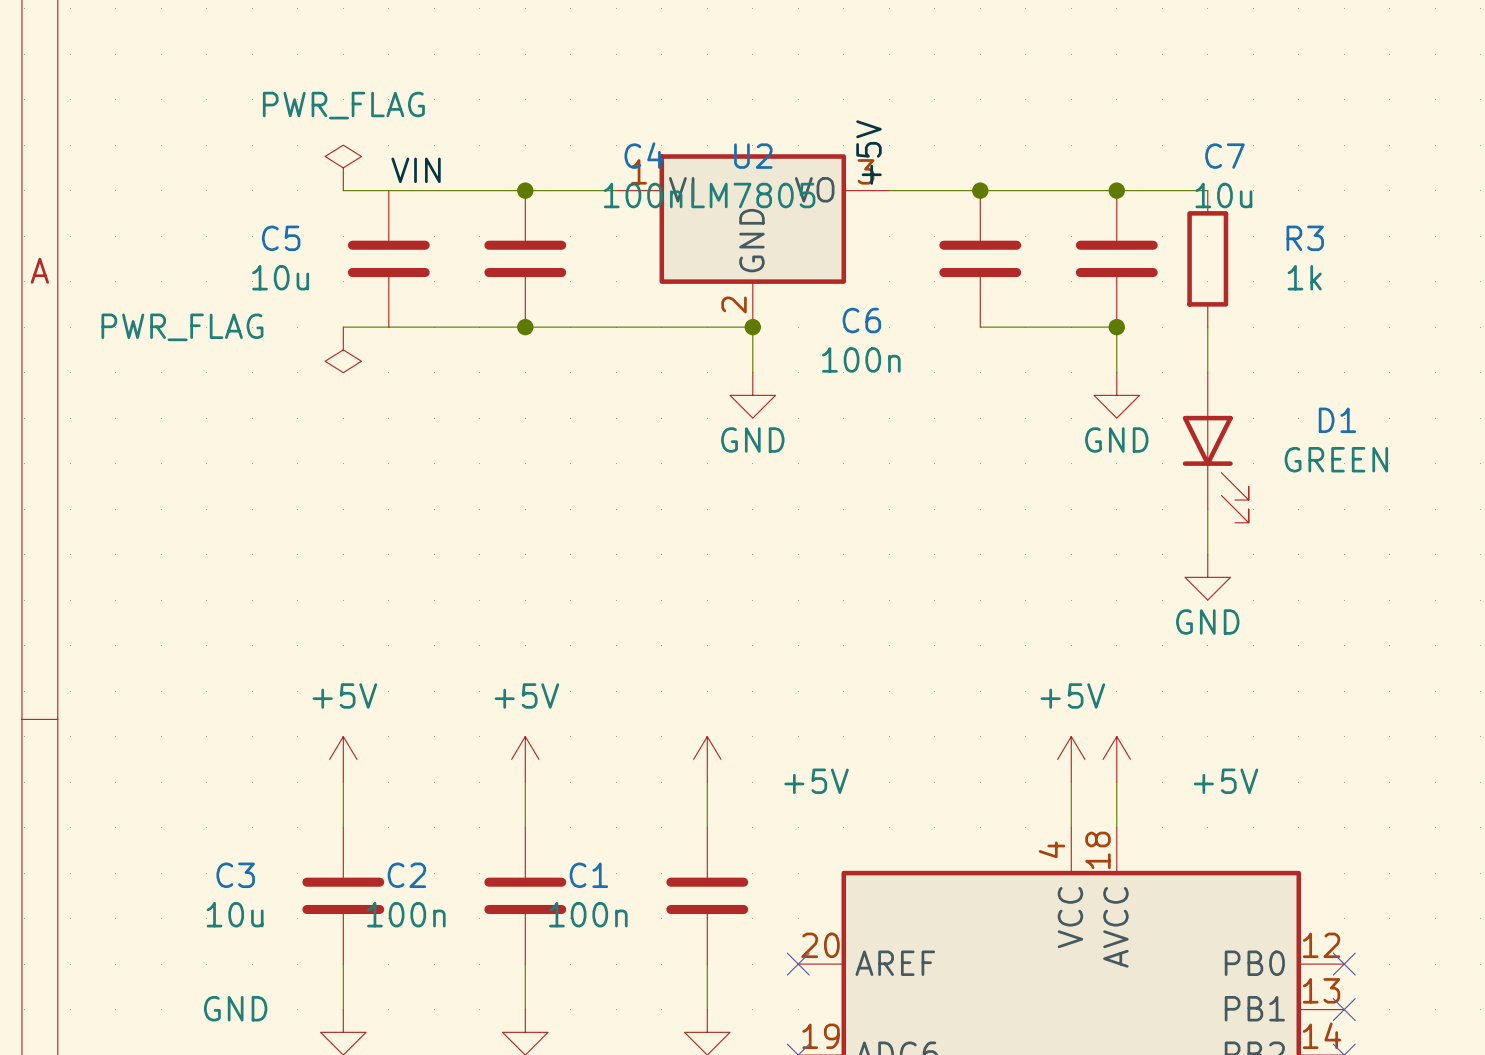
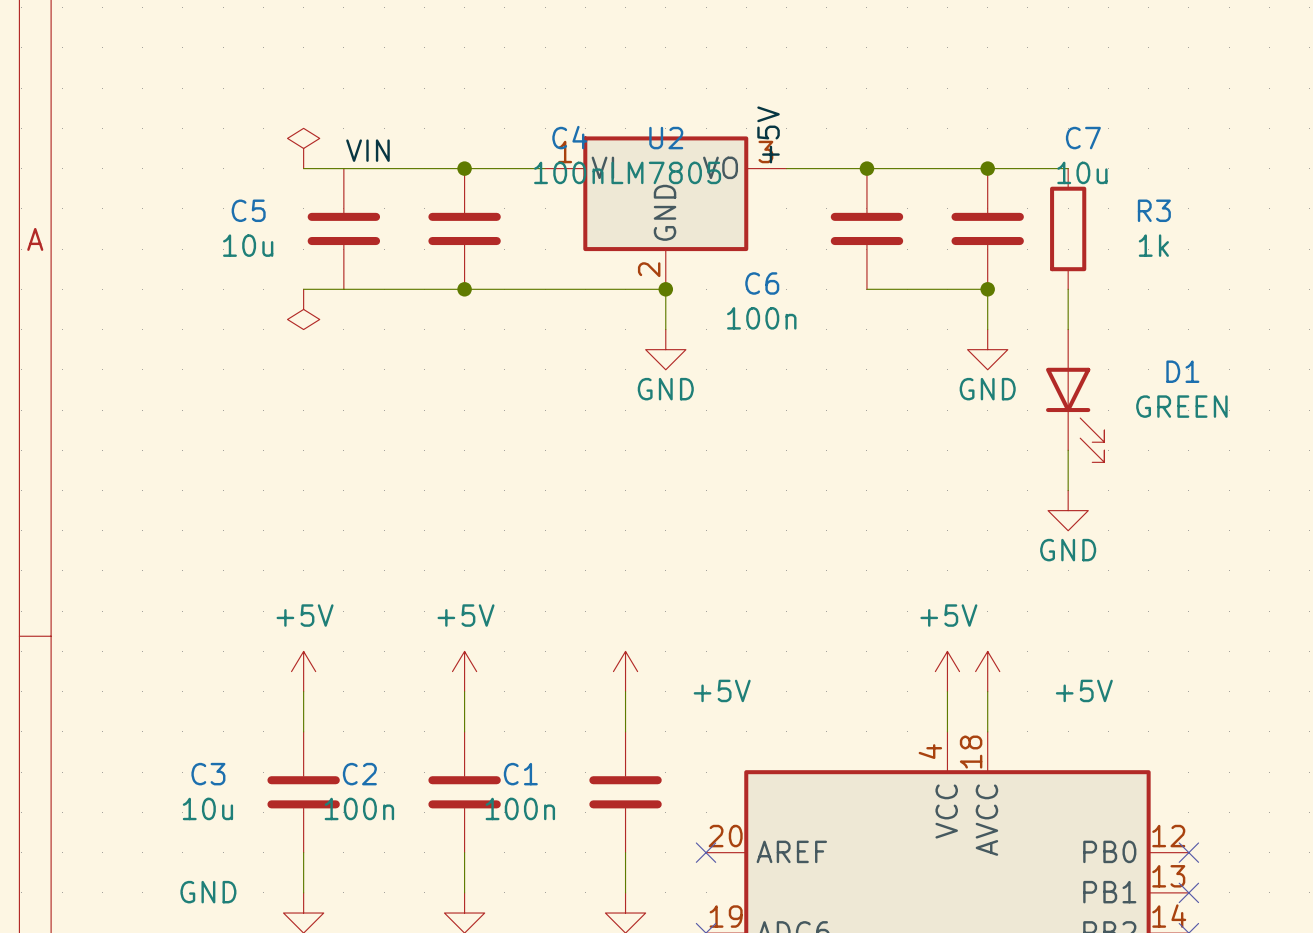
power symbol text: PWR_FLAG (343, 105) -> none
power symbol text: PWR_FLAG (182, 327) -> none

